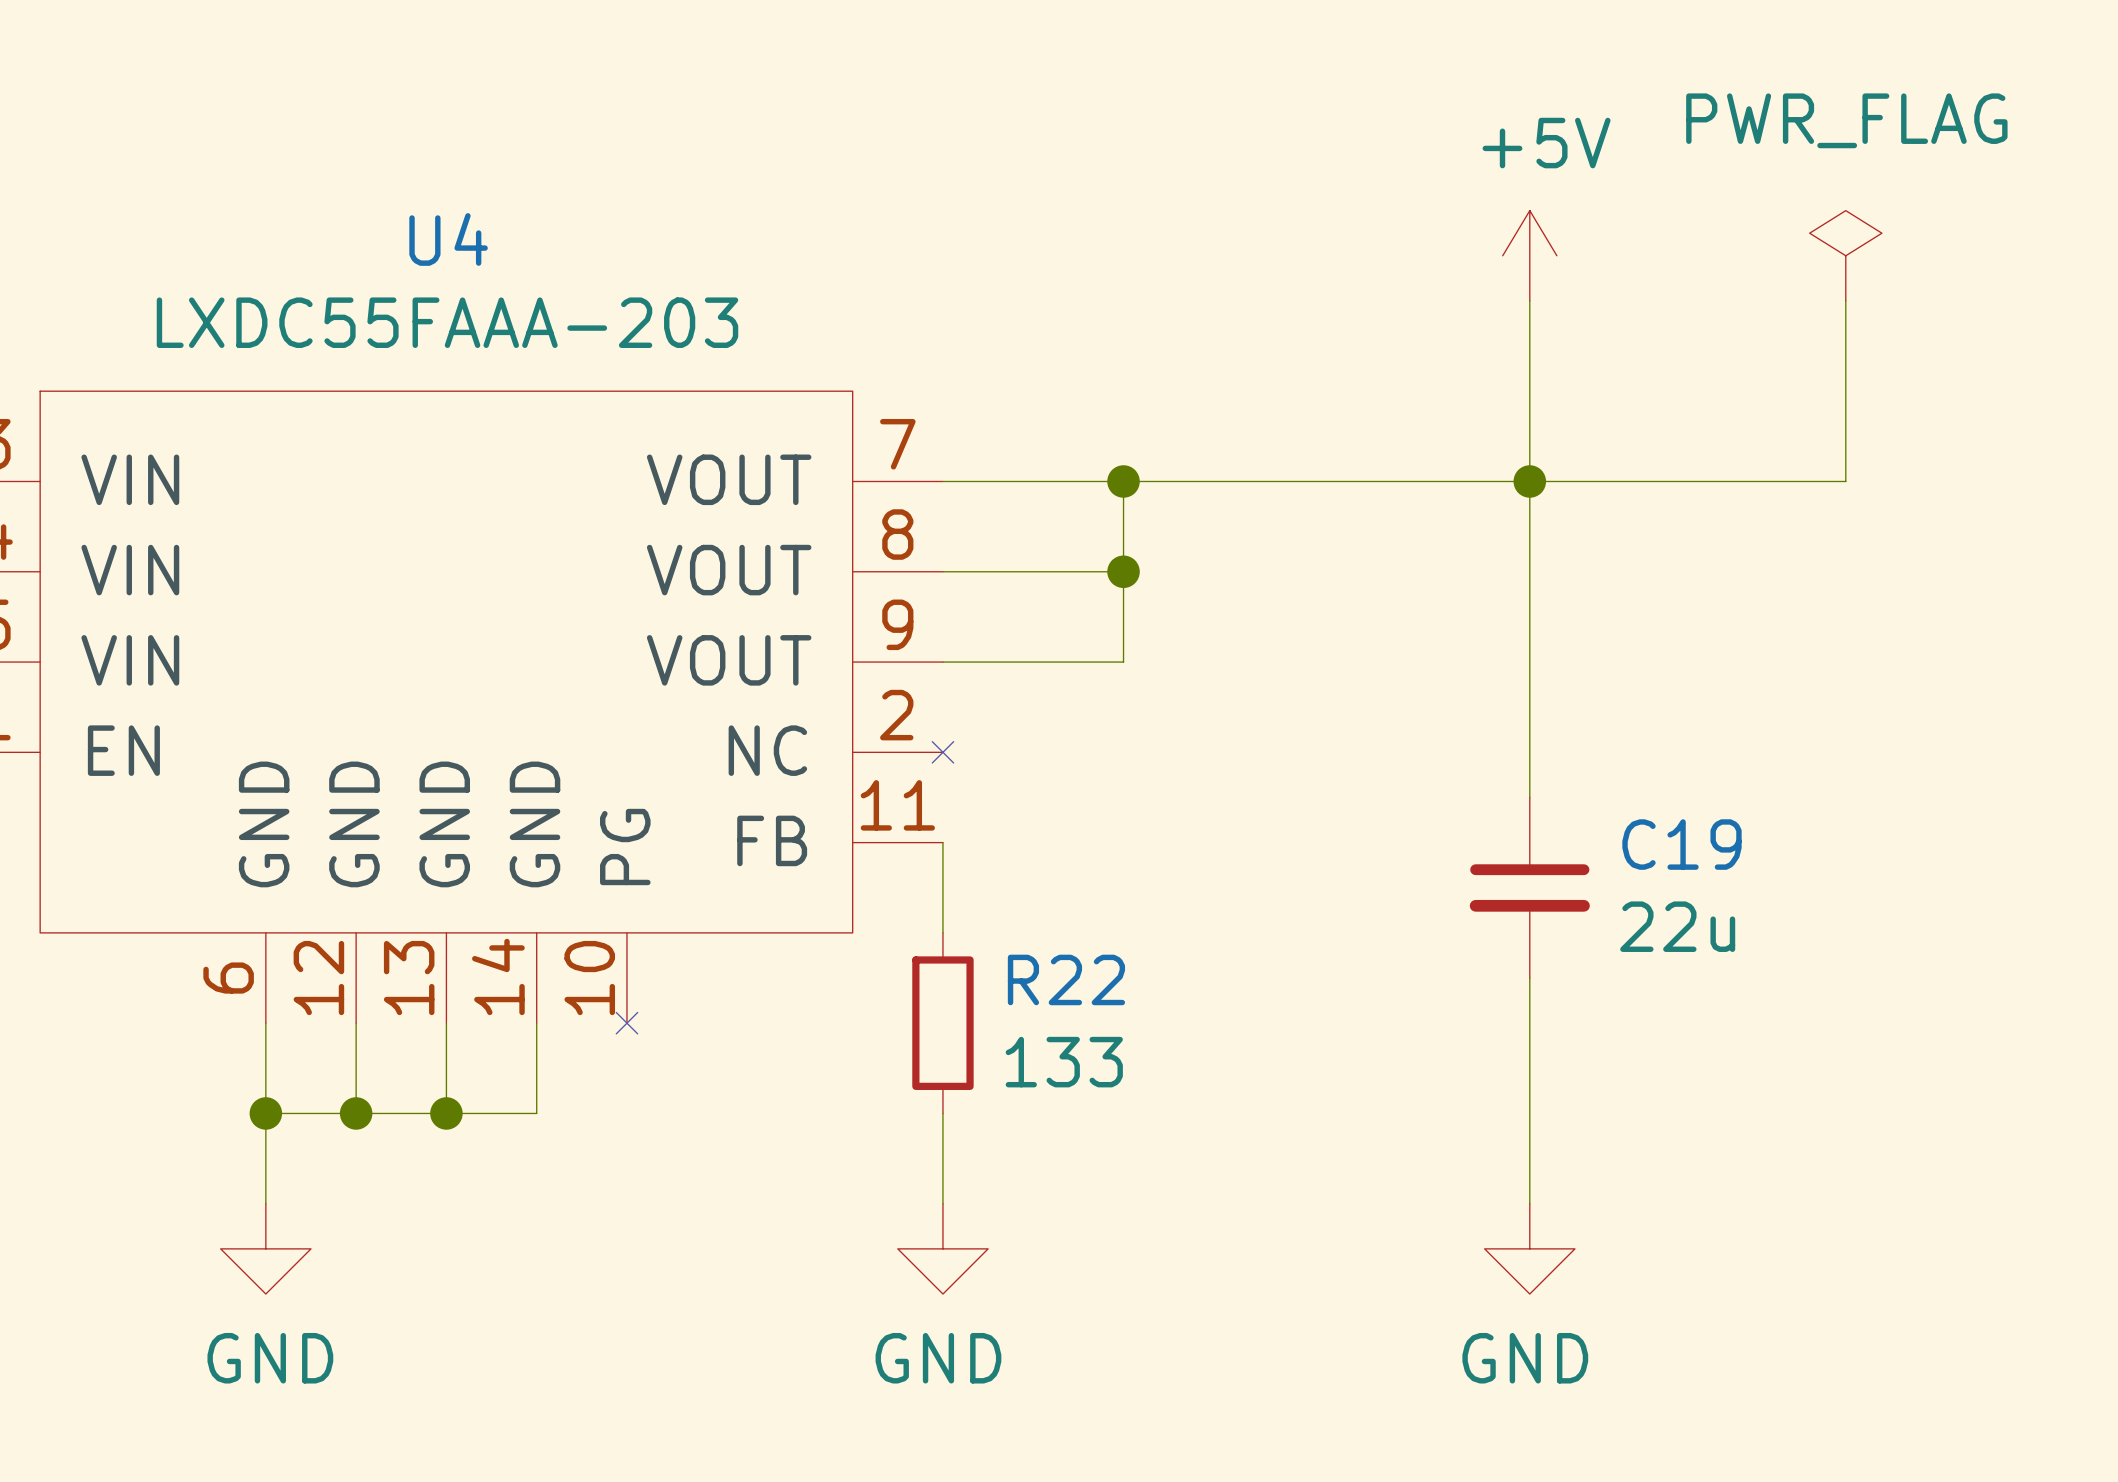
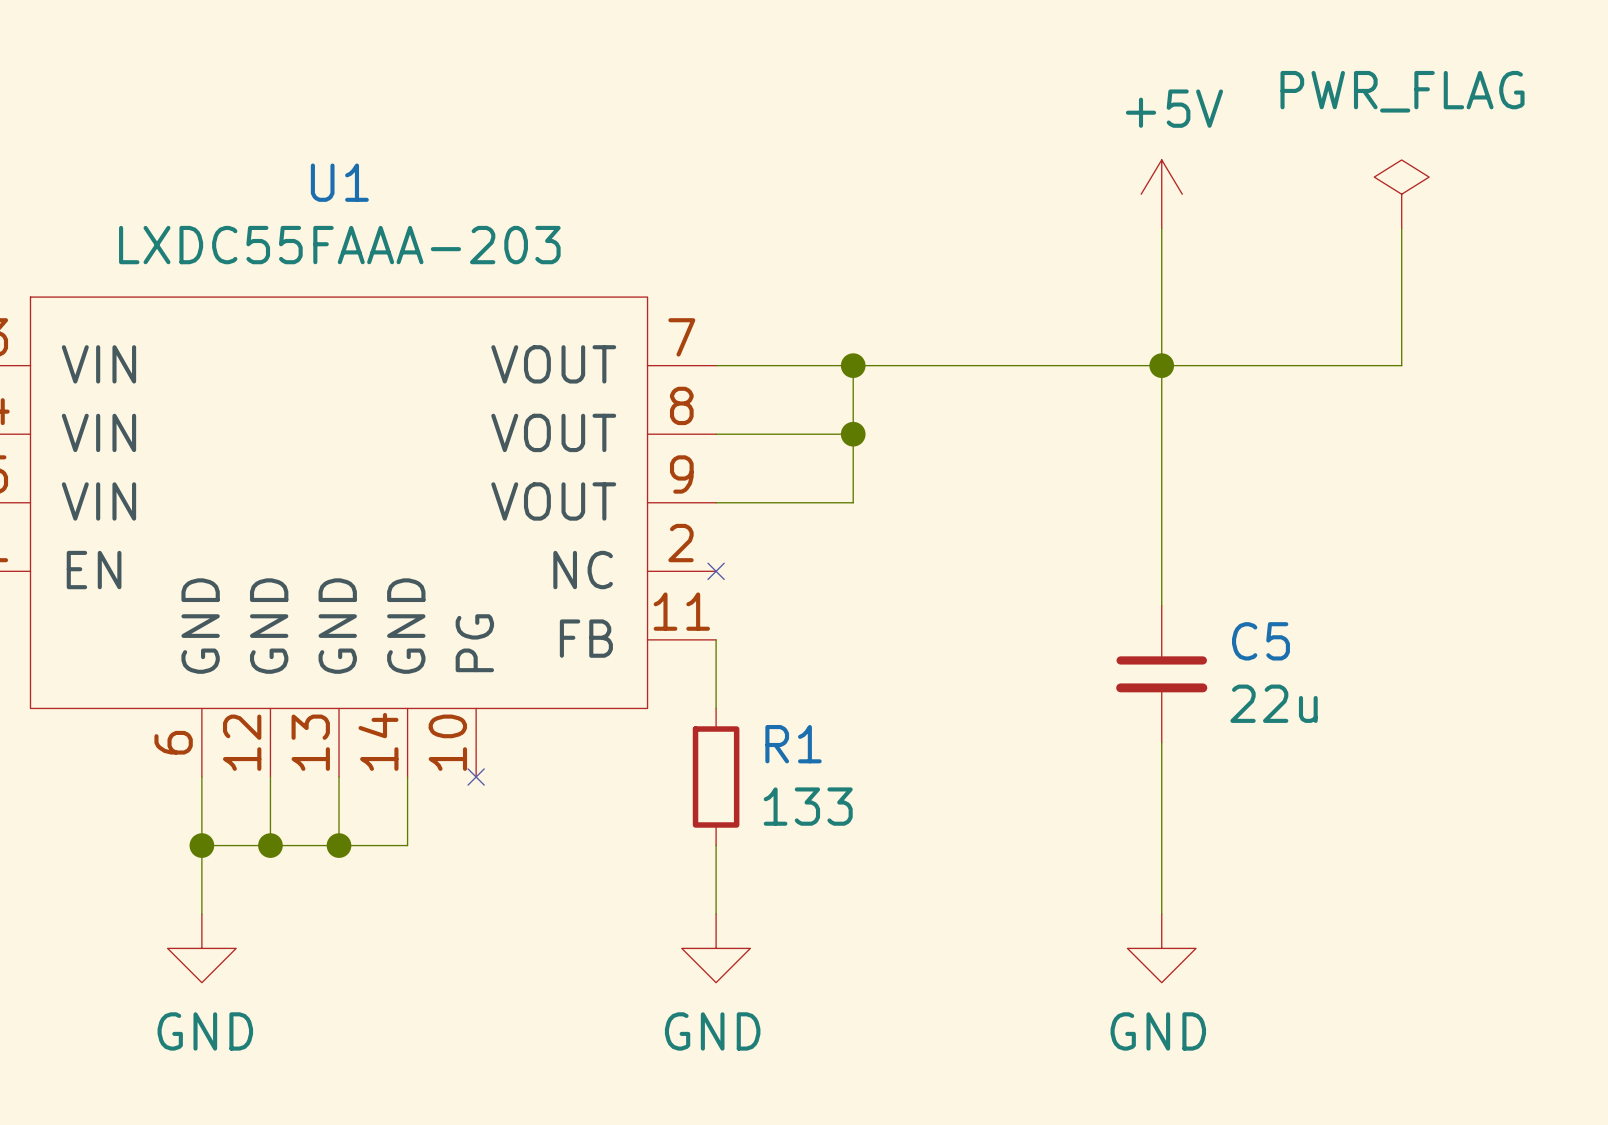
U4 name: U4 (448, 239) -> U1 (339, 182)
C19 name: C19 (1681, 844) -> C5 (1260, 641)
R22 name: R22 (1066, 979) -> R1 (793, 744)

